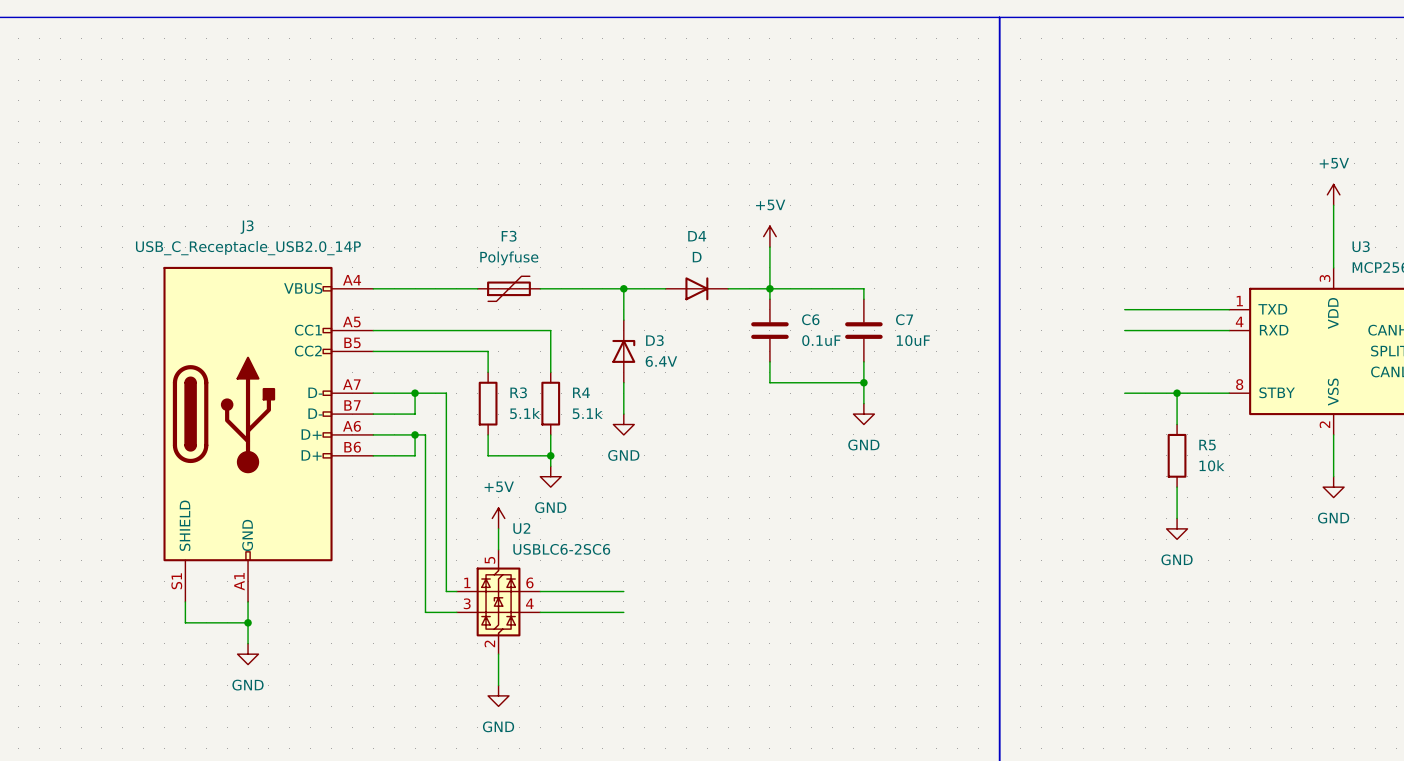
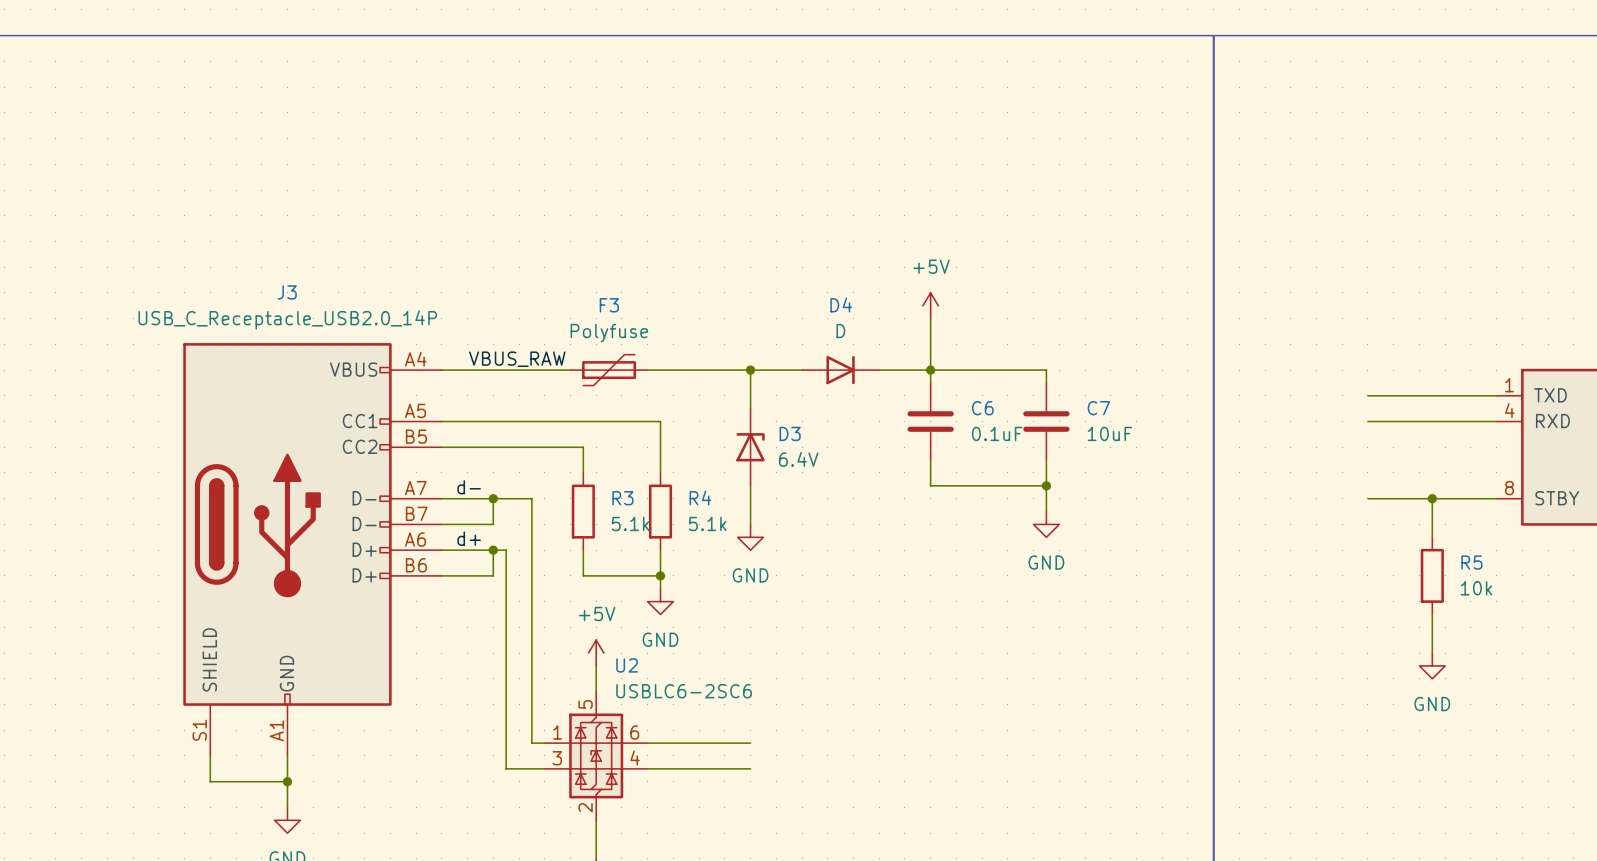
label: none -> VBUS_RAW (517, 359)
label: none -> d- (469, 487)
label: none -> d+ (469, 538)

